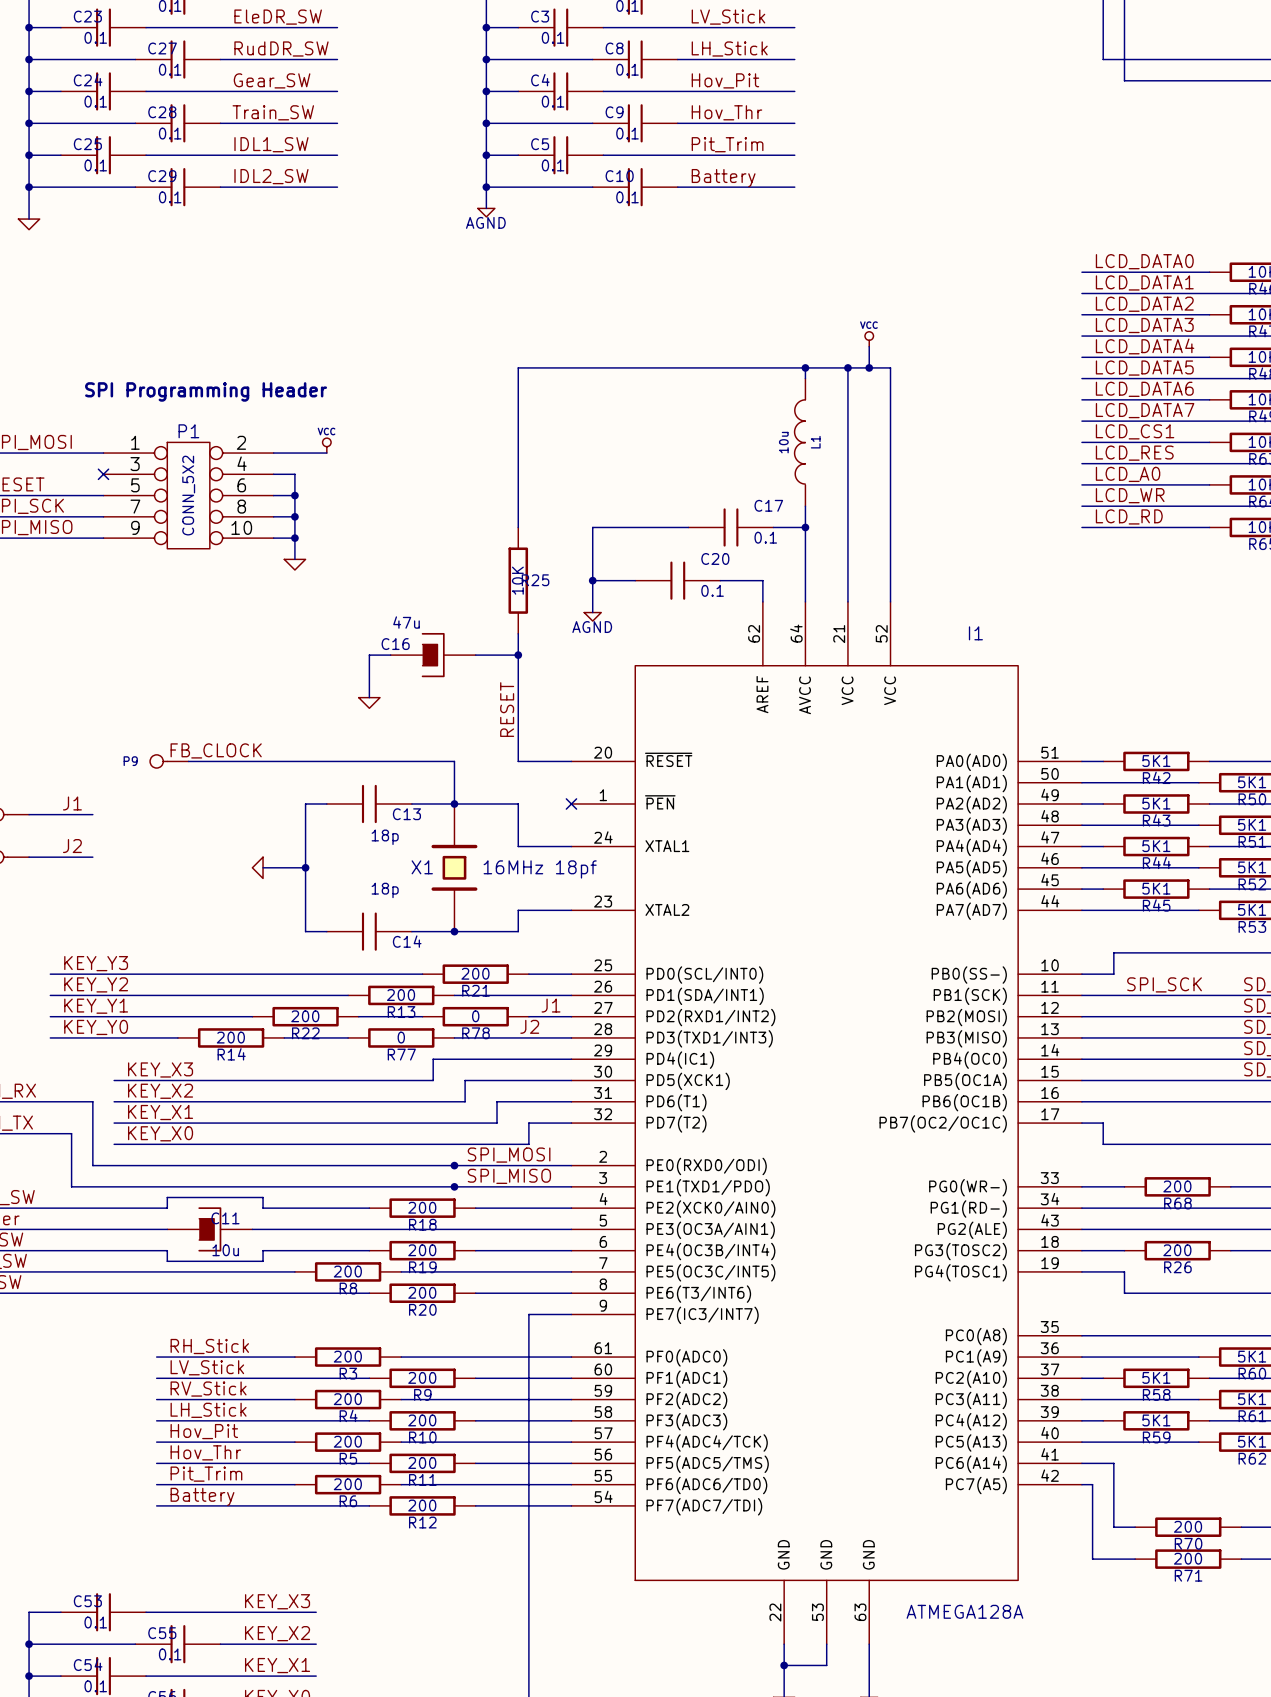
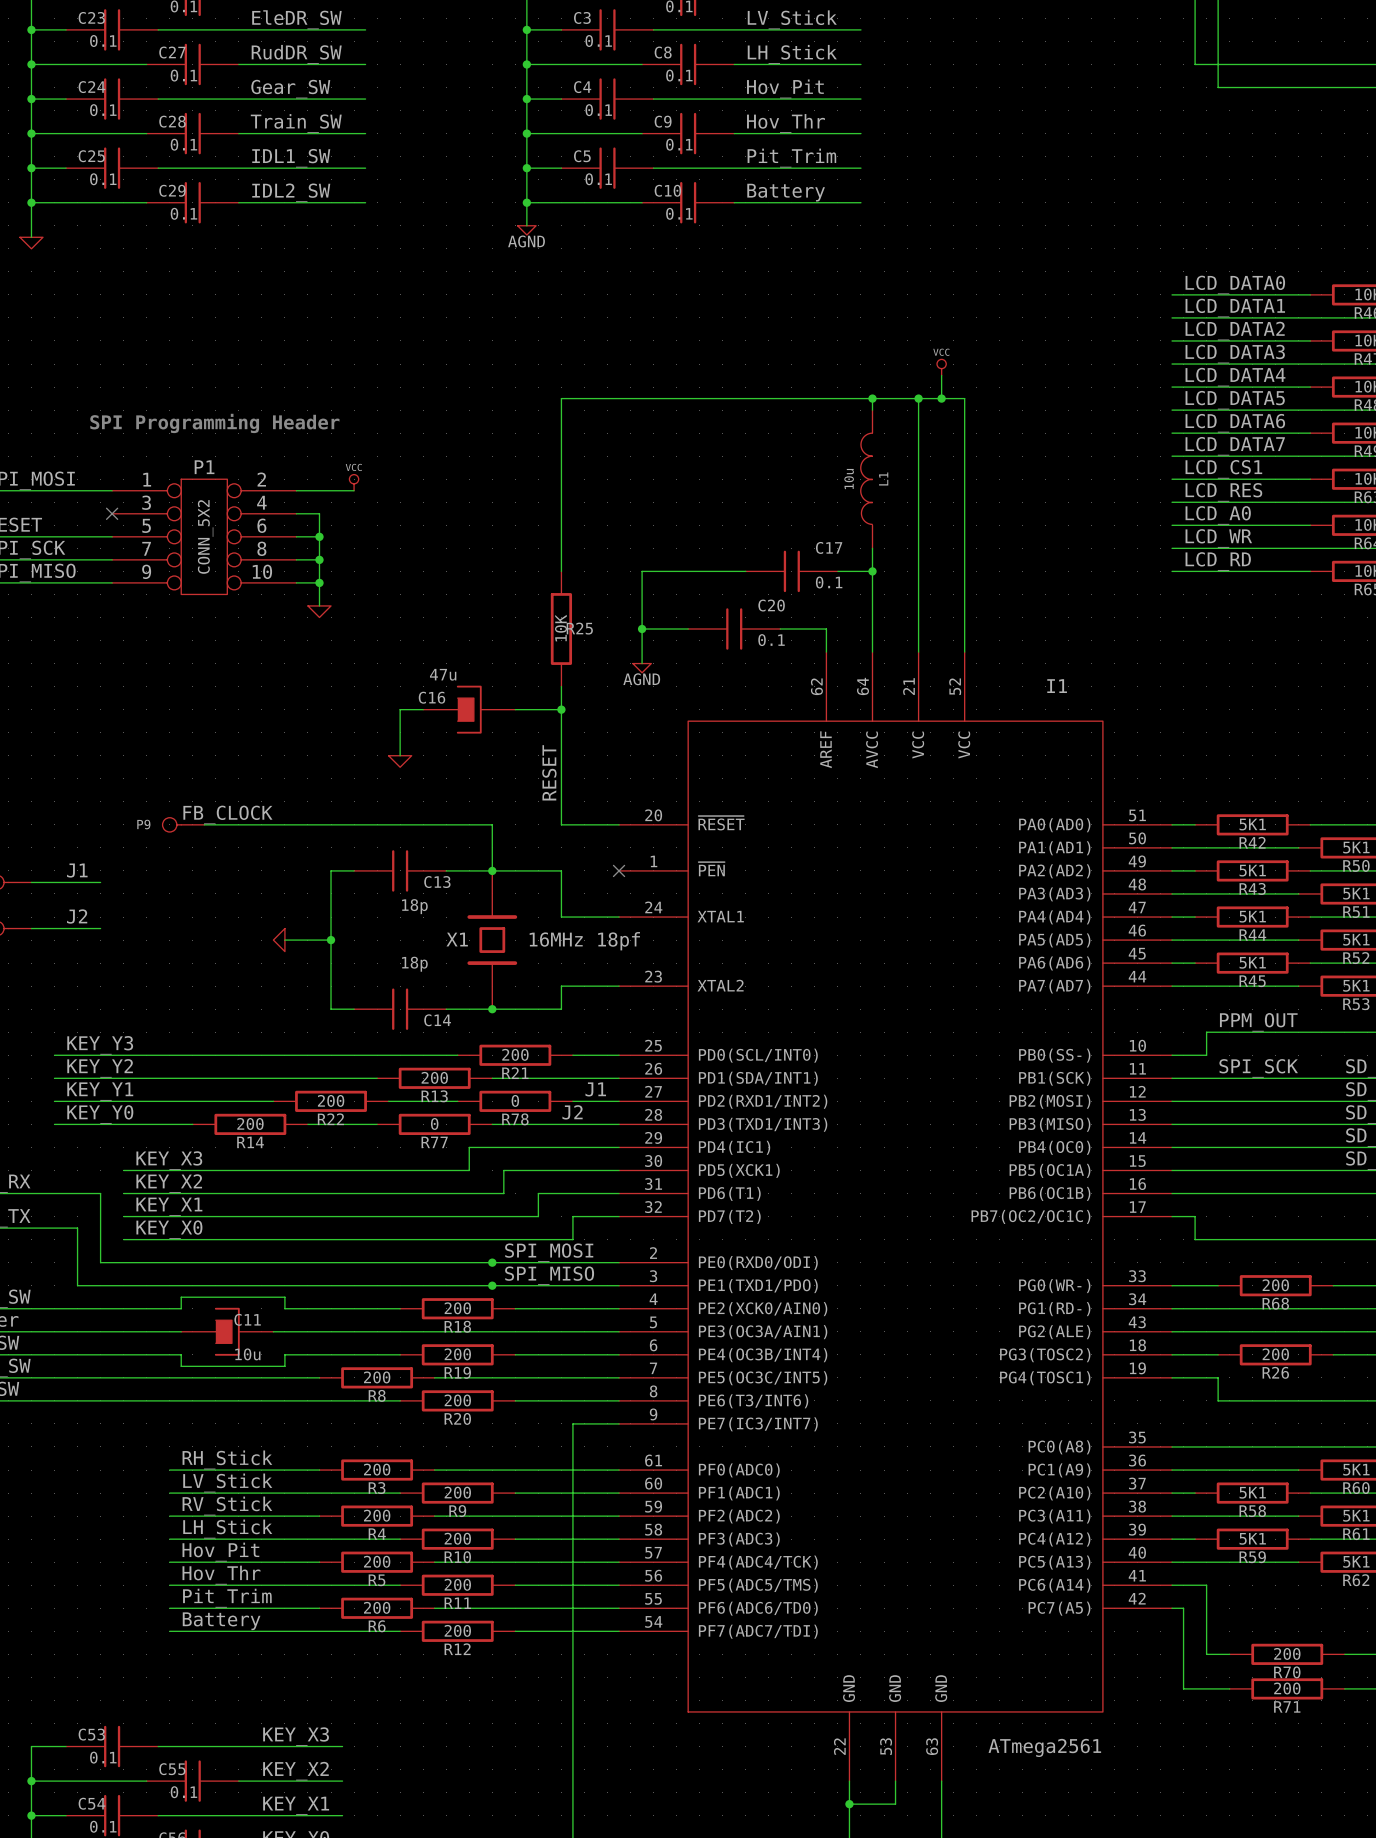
label: none -> PPM_OUT (1258, 1022)
I1 value: ATMEGA128A (964, 1611) -> ATmega2561 (1044, 1747)

